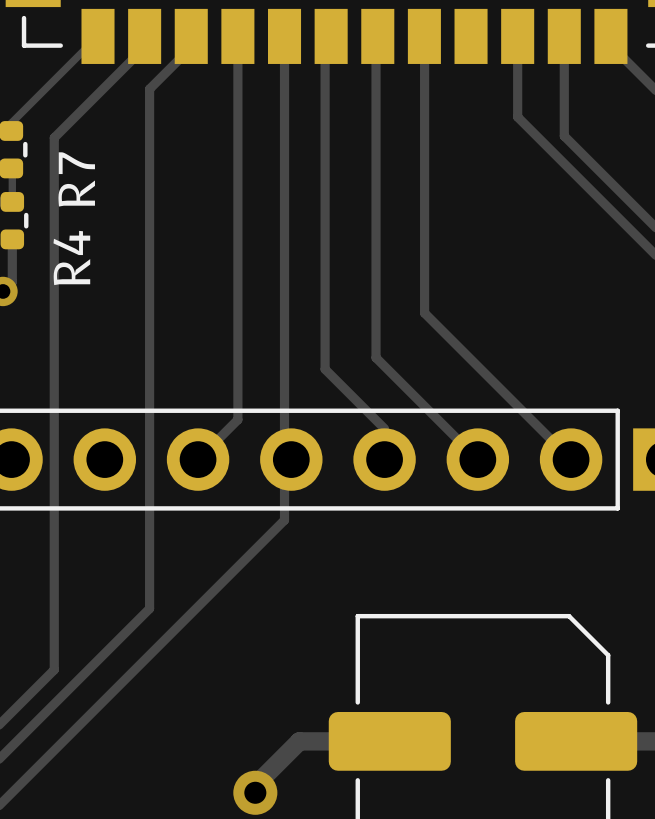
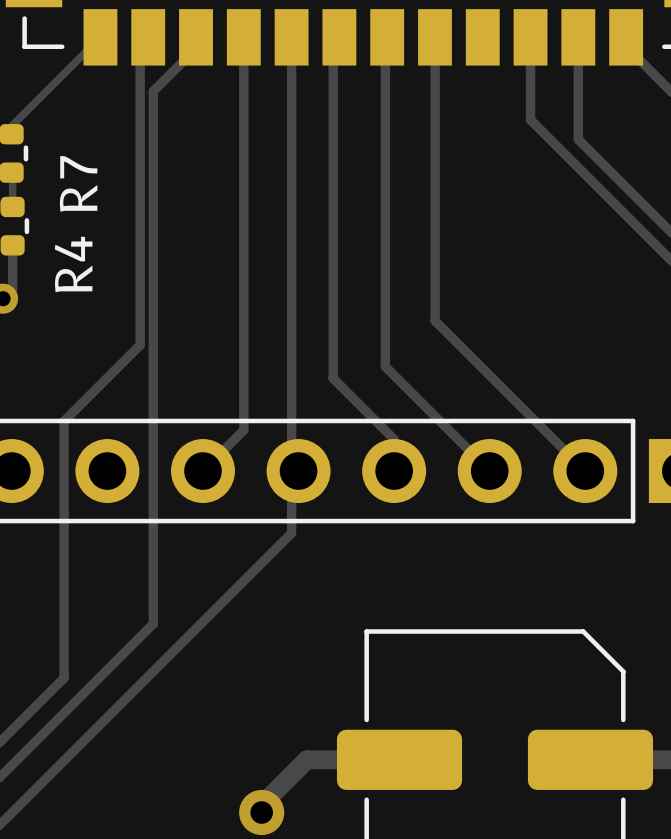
track: (136, 55) (54, 137) (54, 669) -> (140, 56) (140, 345) (64, 421) (64, 677) (55, 686)

